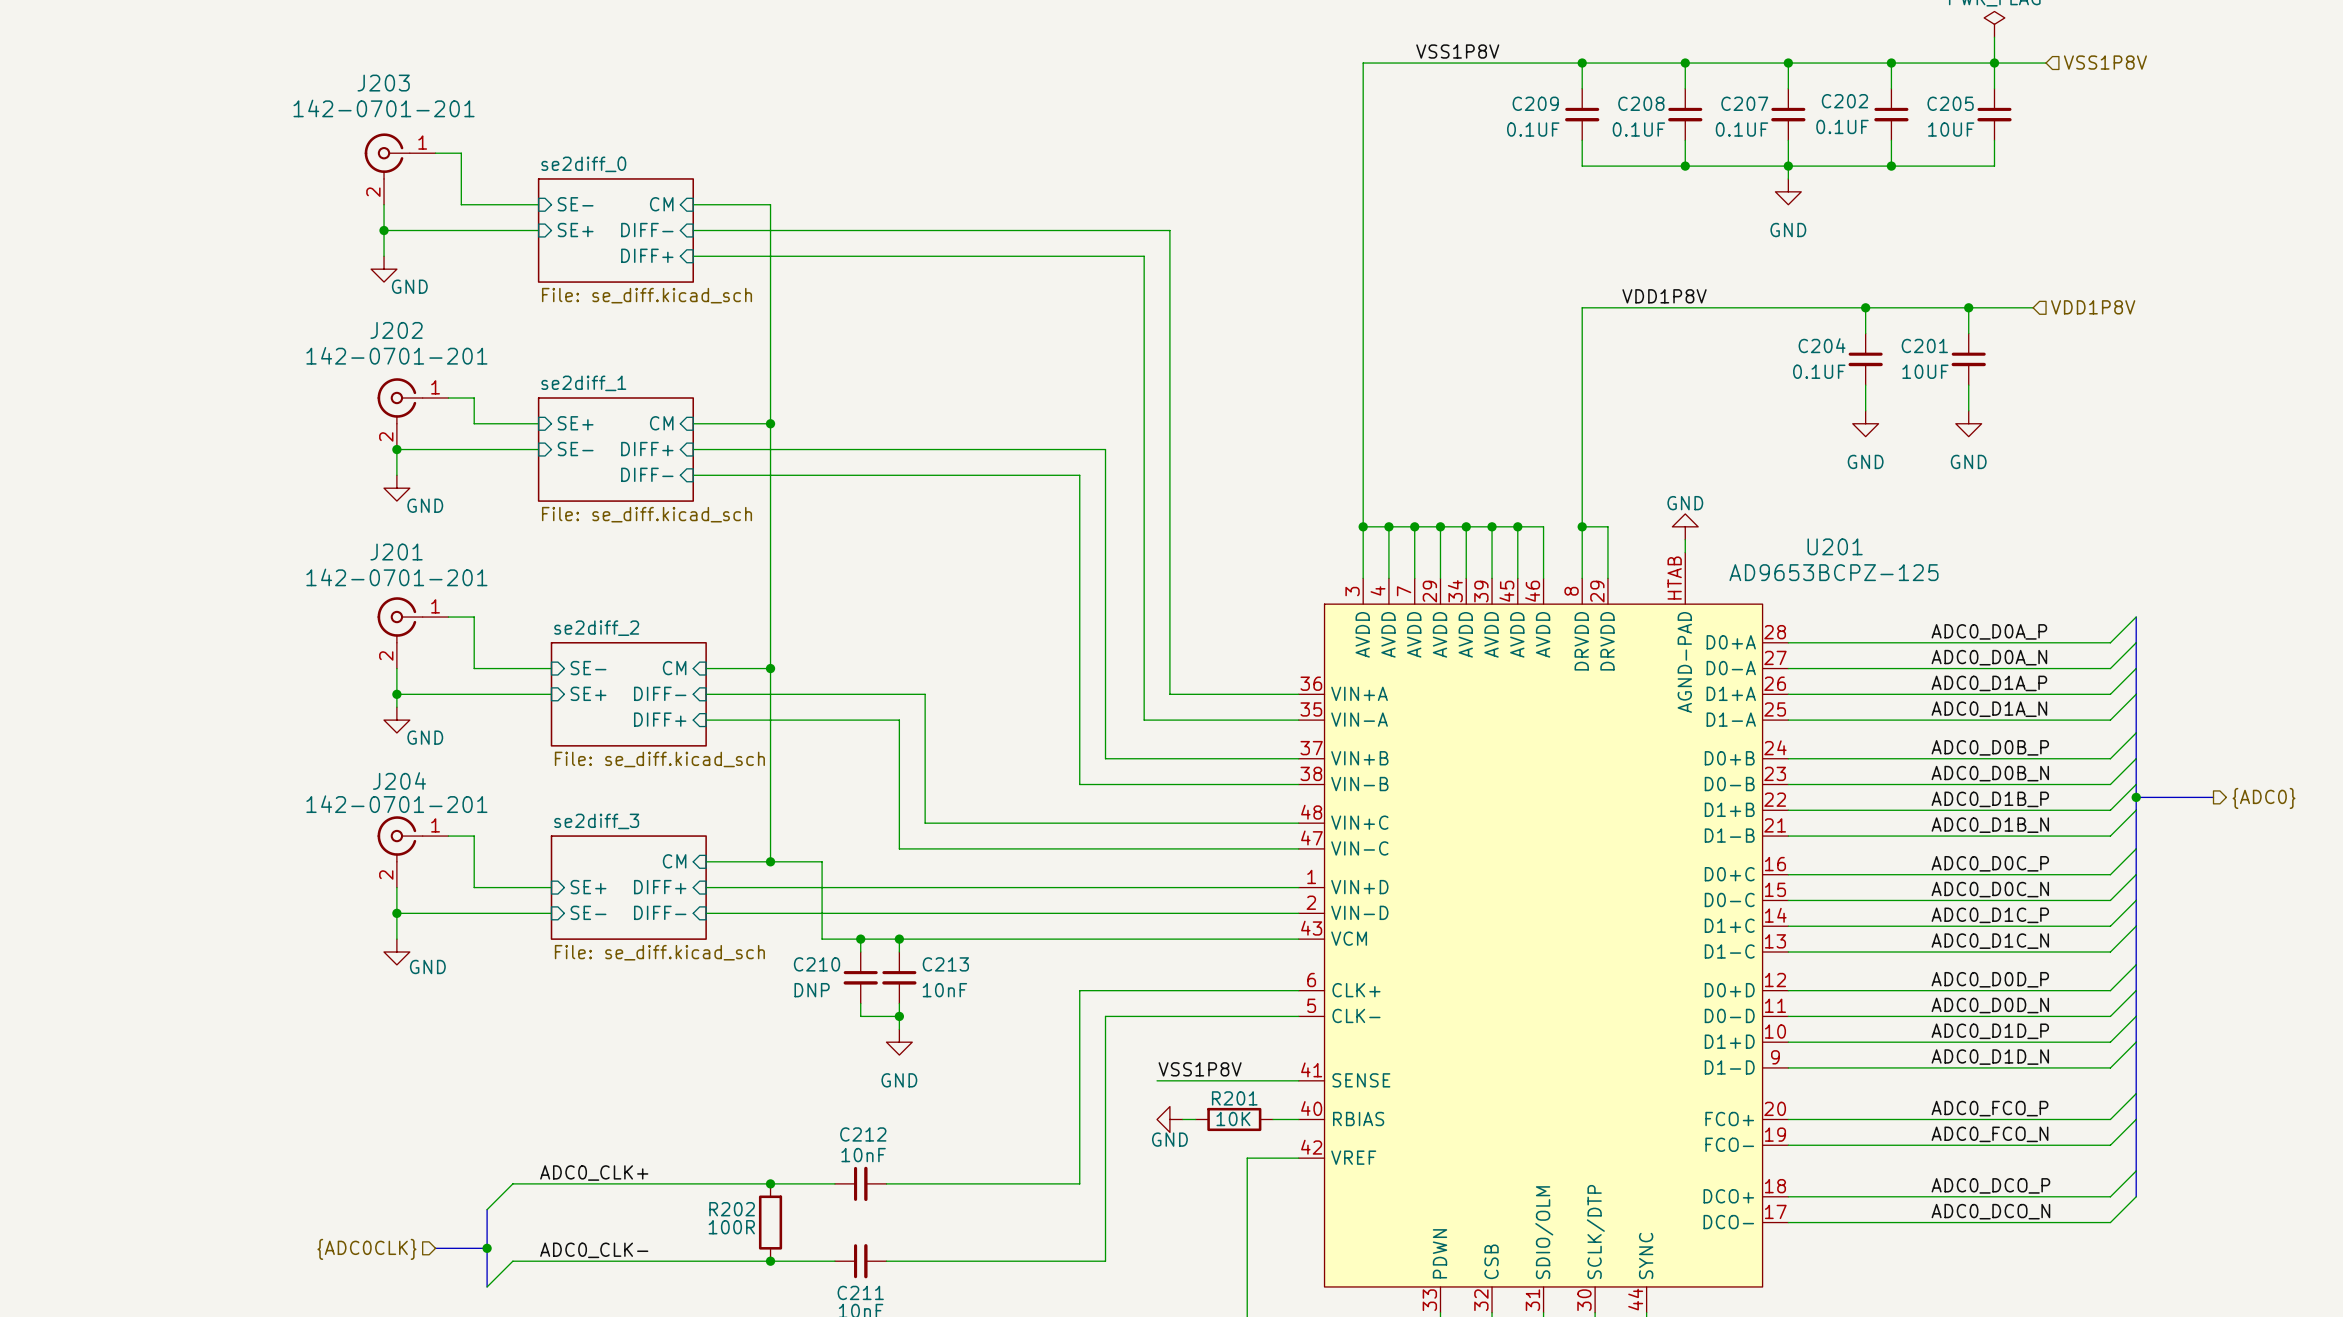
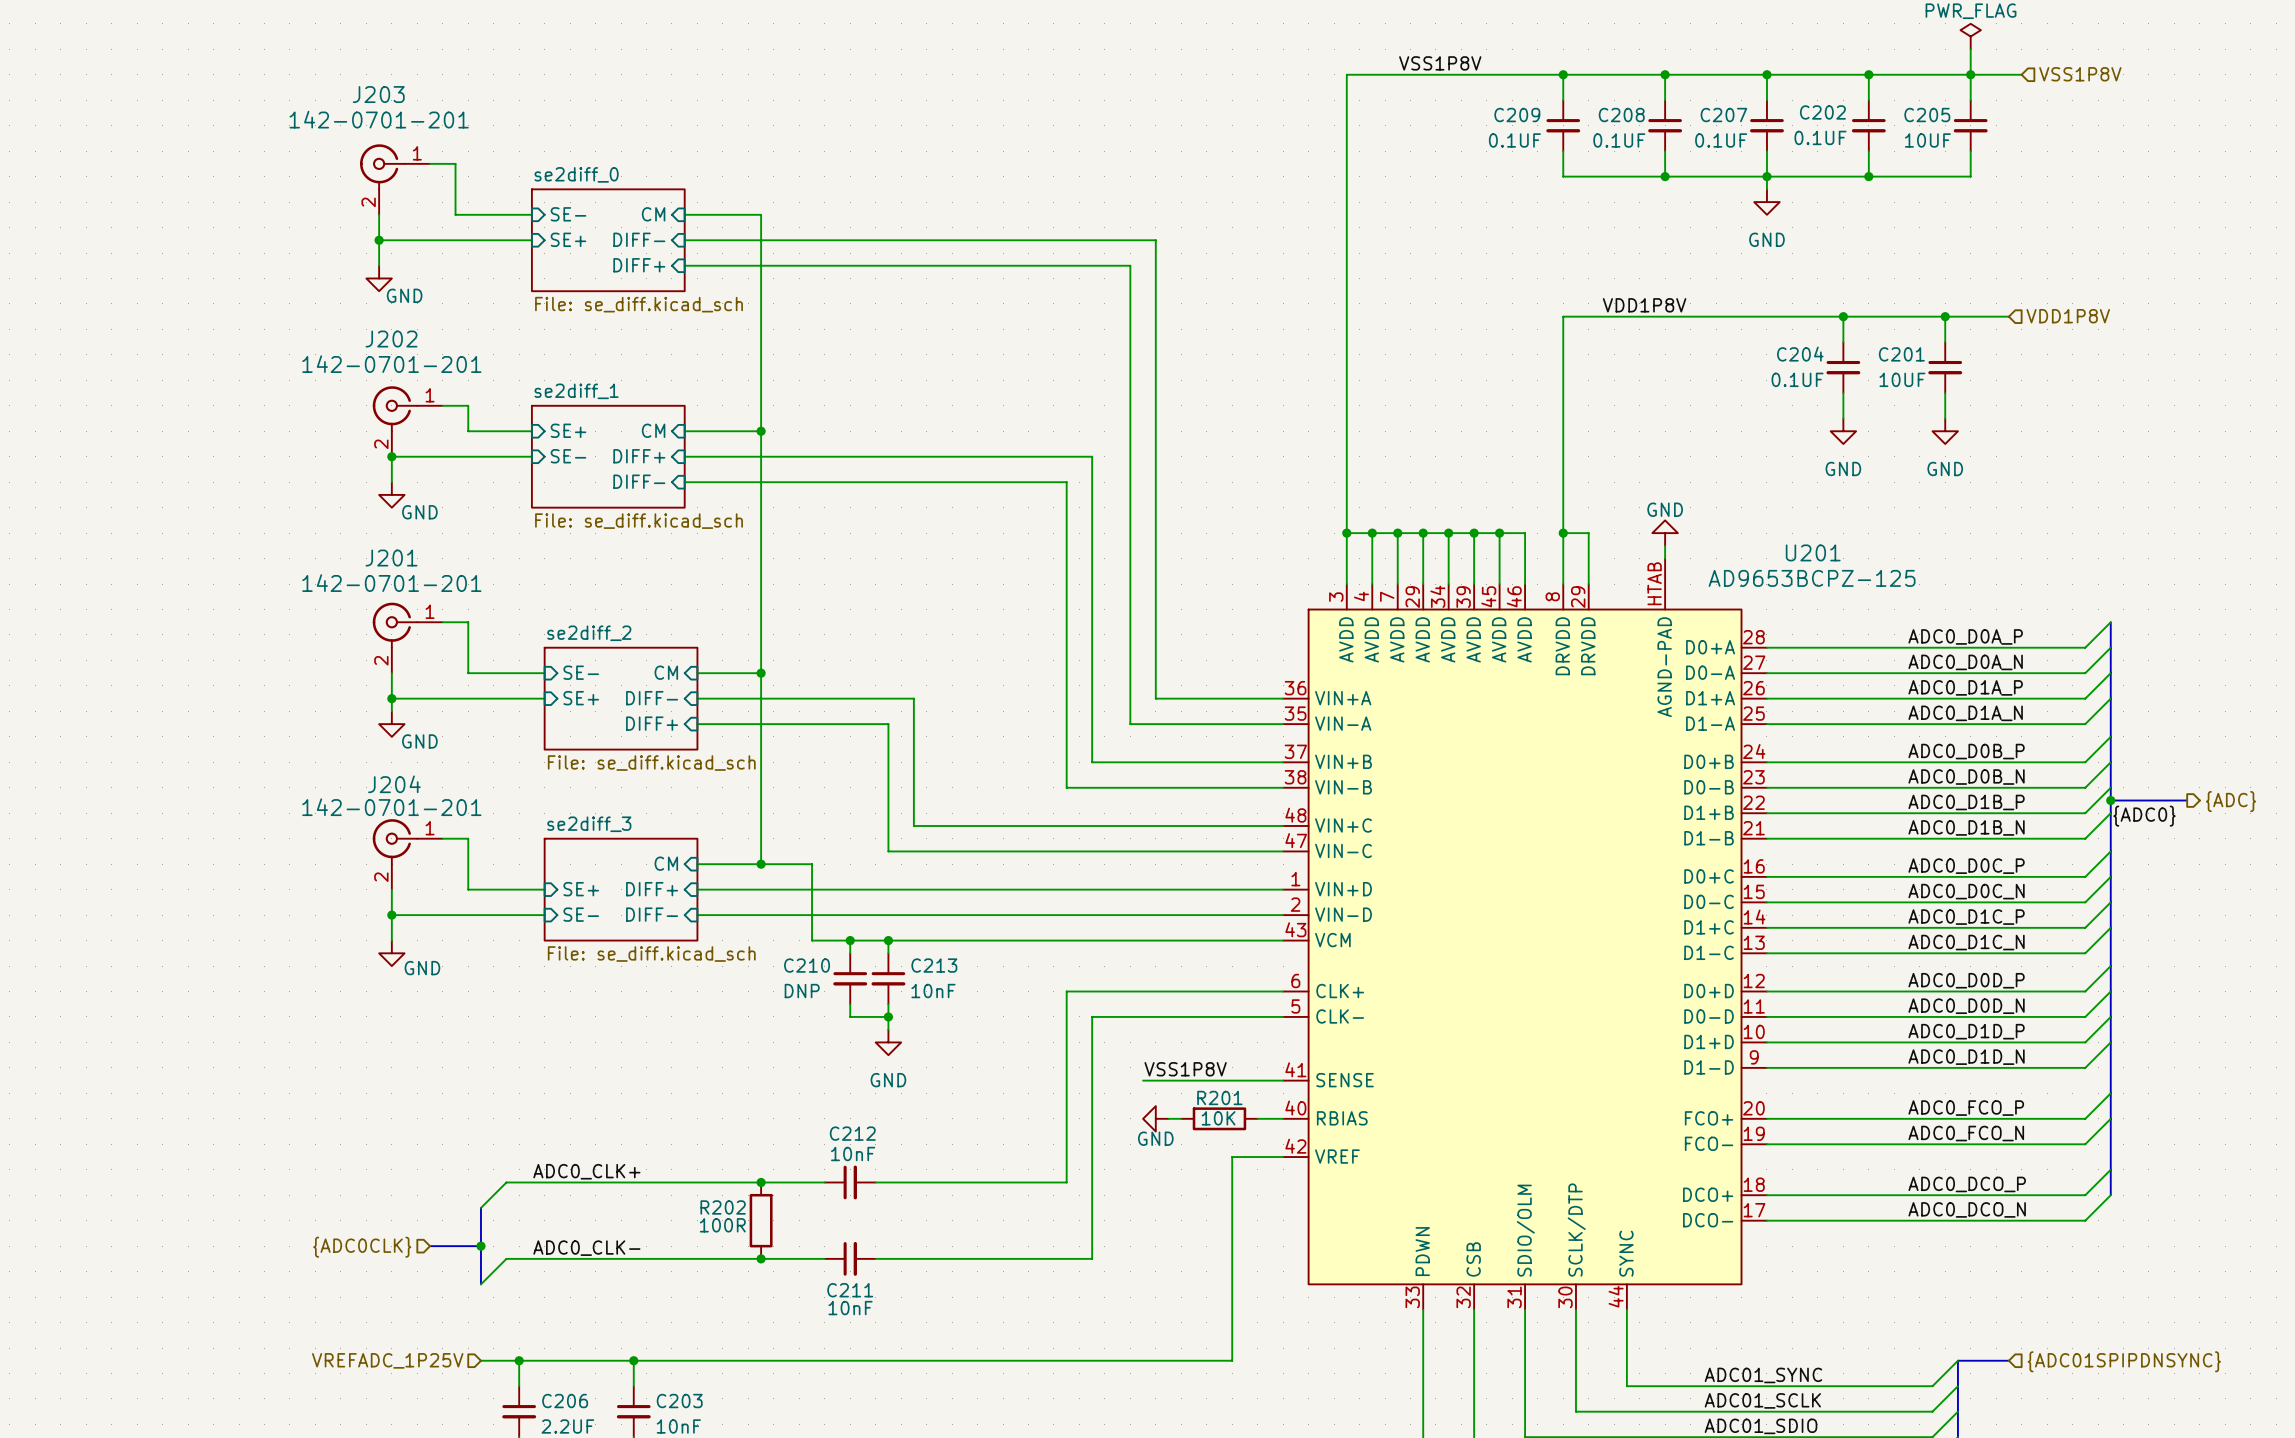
hierarchical label: {ADC0} (2264, 798) -> {ADC} (2231, 801)
label: none -> {ADC0} (2144, 816)

